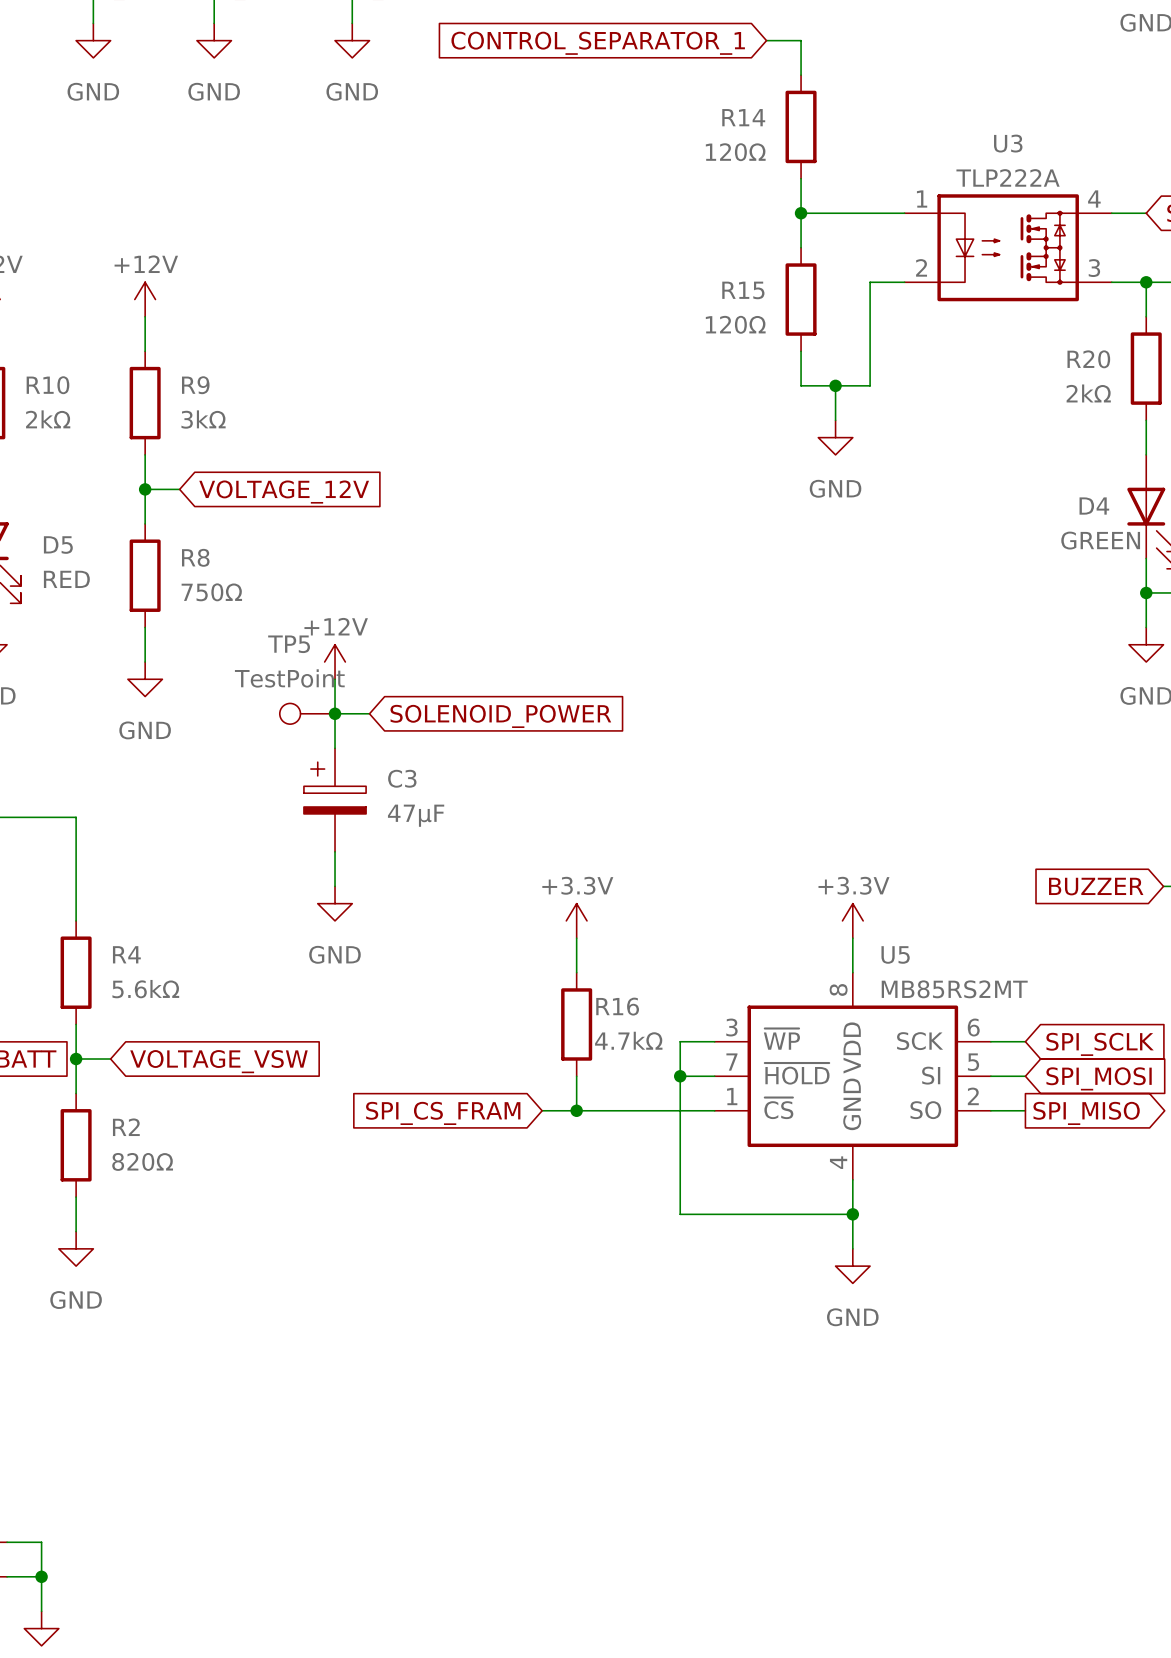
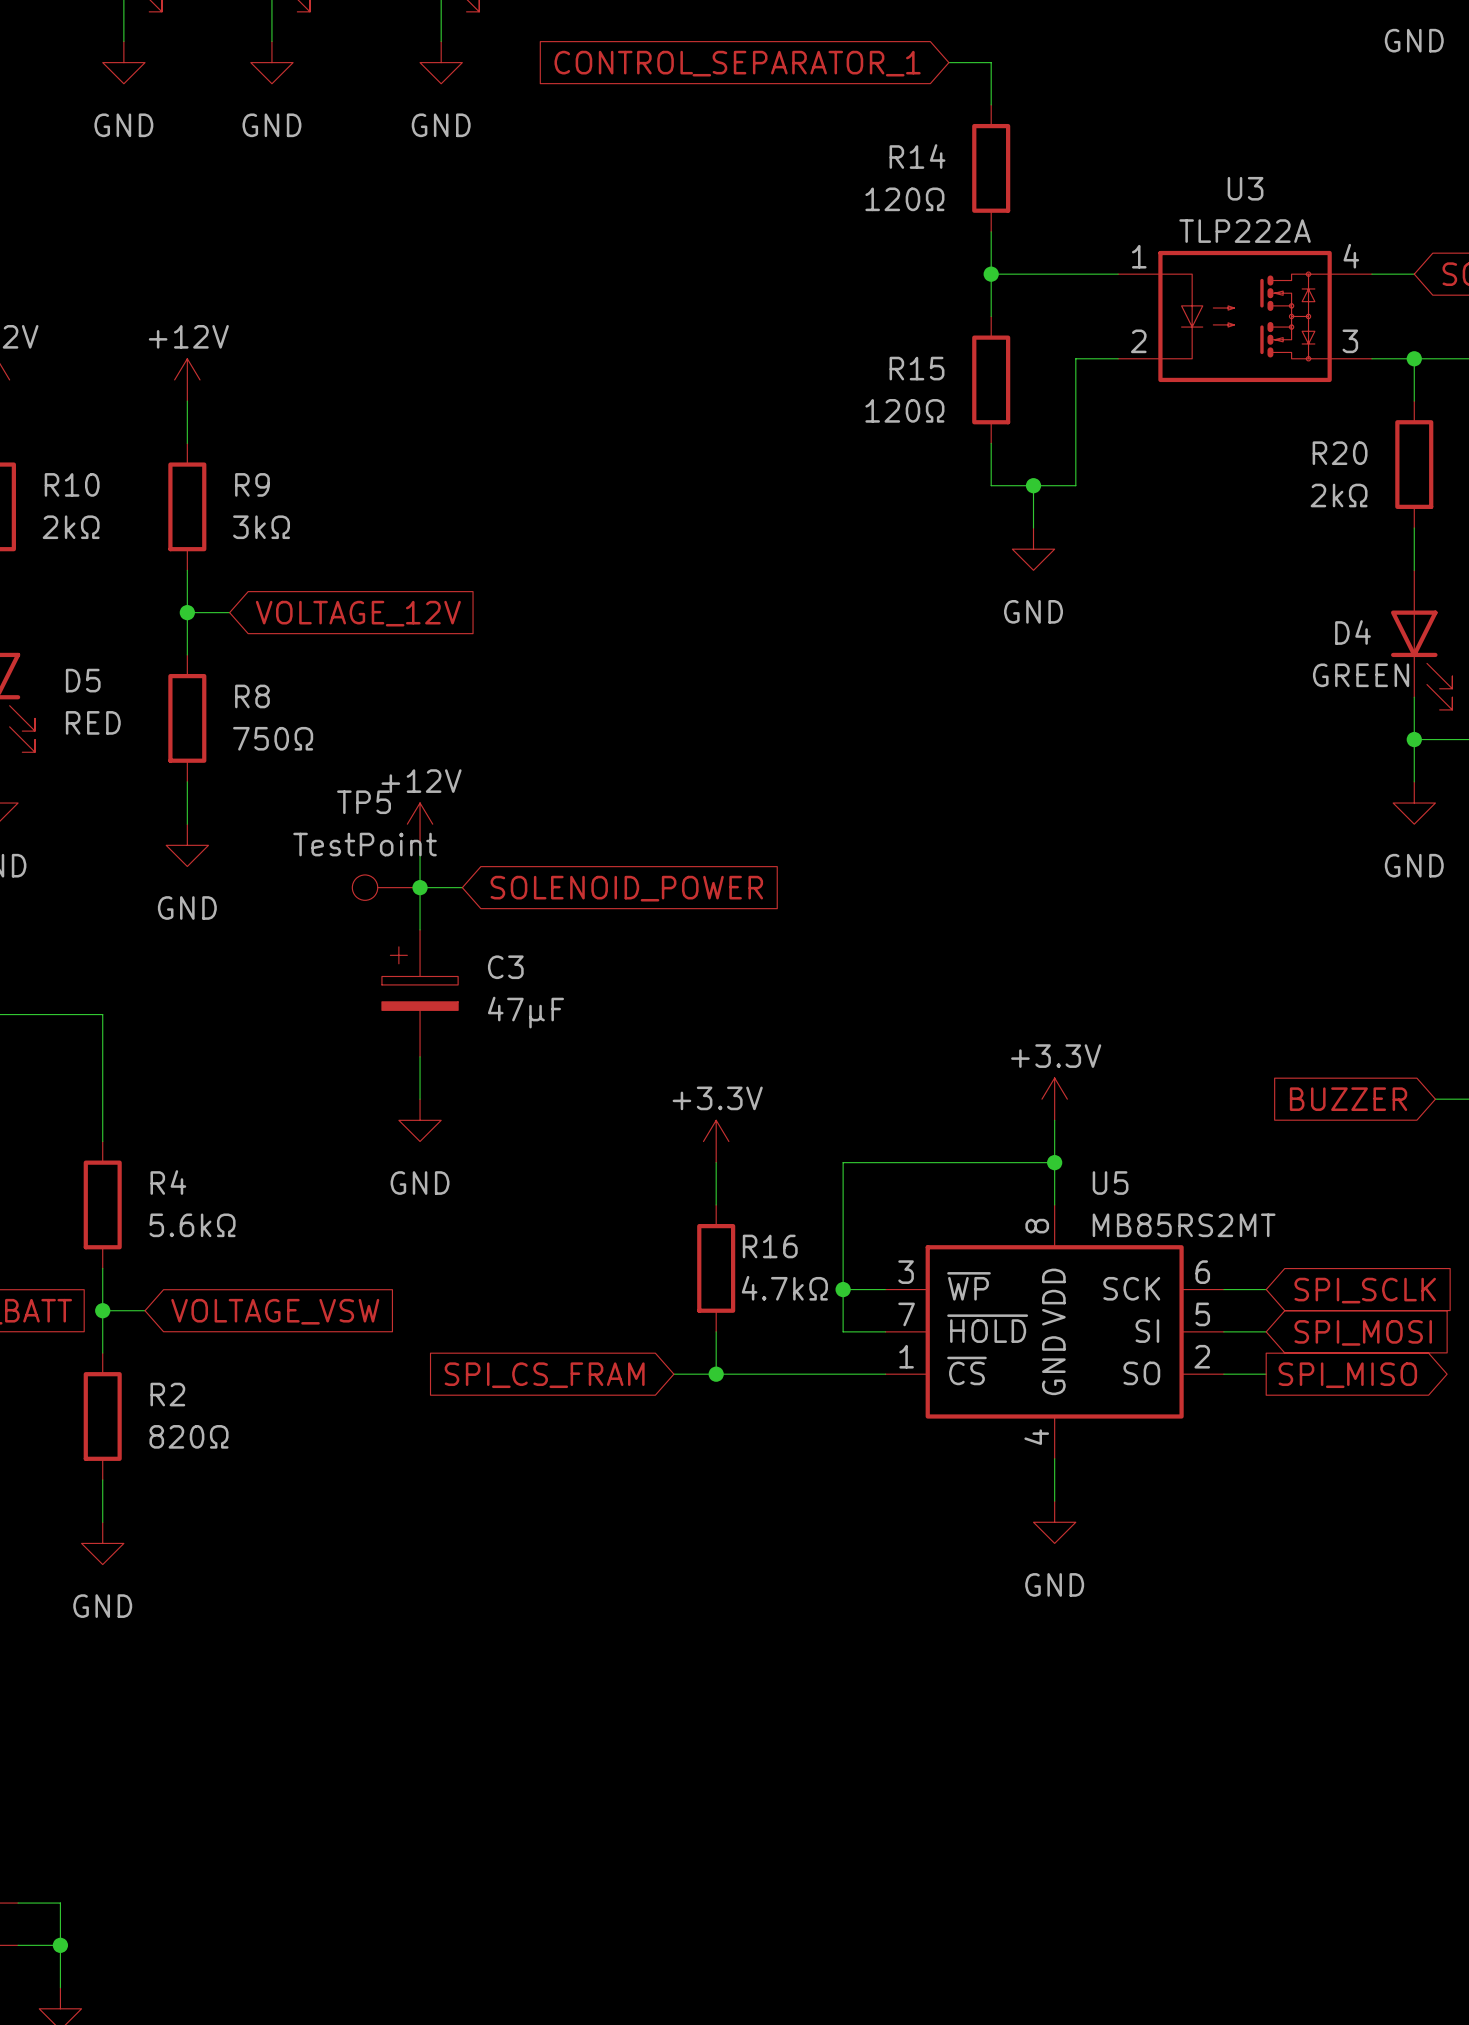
wire: none -> (1054, 1120) (1054, 1162) (843, 1162) (843, 1289)
power symbol position: +3.3V (852, 920) -> +3.3V (1054, 1099)
junction: none -> (1054, 1162)
wire: (680, 1076) (680, 1214) (852, 1214) (852, 1248) -> none
junction position: (680, 1076) -> (843, 1289)
junction: (852, 1214) -> none
power symbol position: GND (852, 1266) -> GND (1054, 1522)

